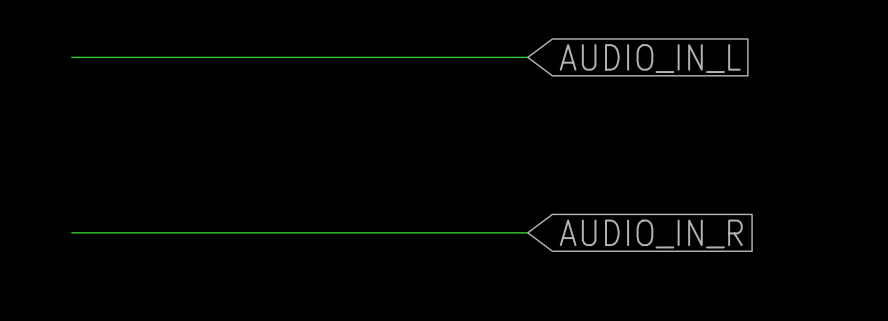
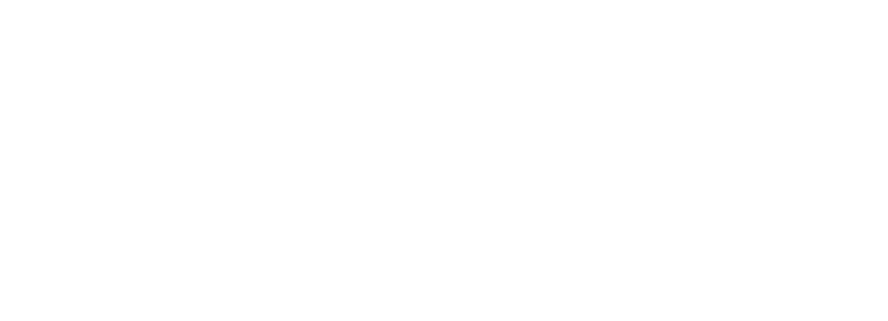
wire: (71, 57) (527, 57) -> none
global label: AUDIO_IN_L (650, 58) -> none
wire: (71, 232) (527, 232) -> none
global label: AUDIO_IN_R (651, 234) -> none

